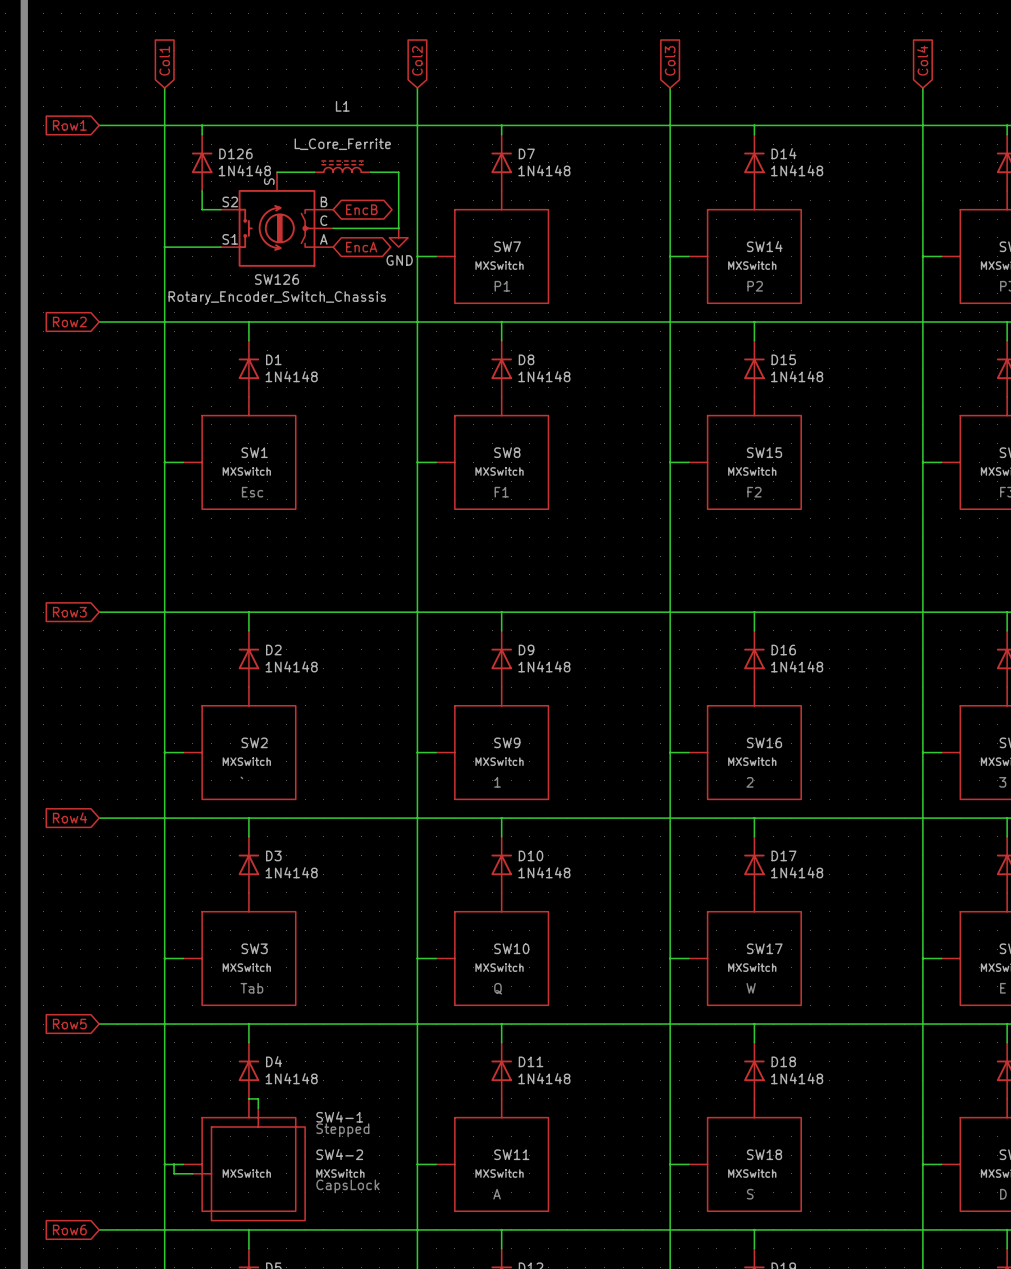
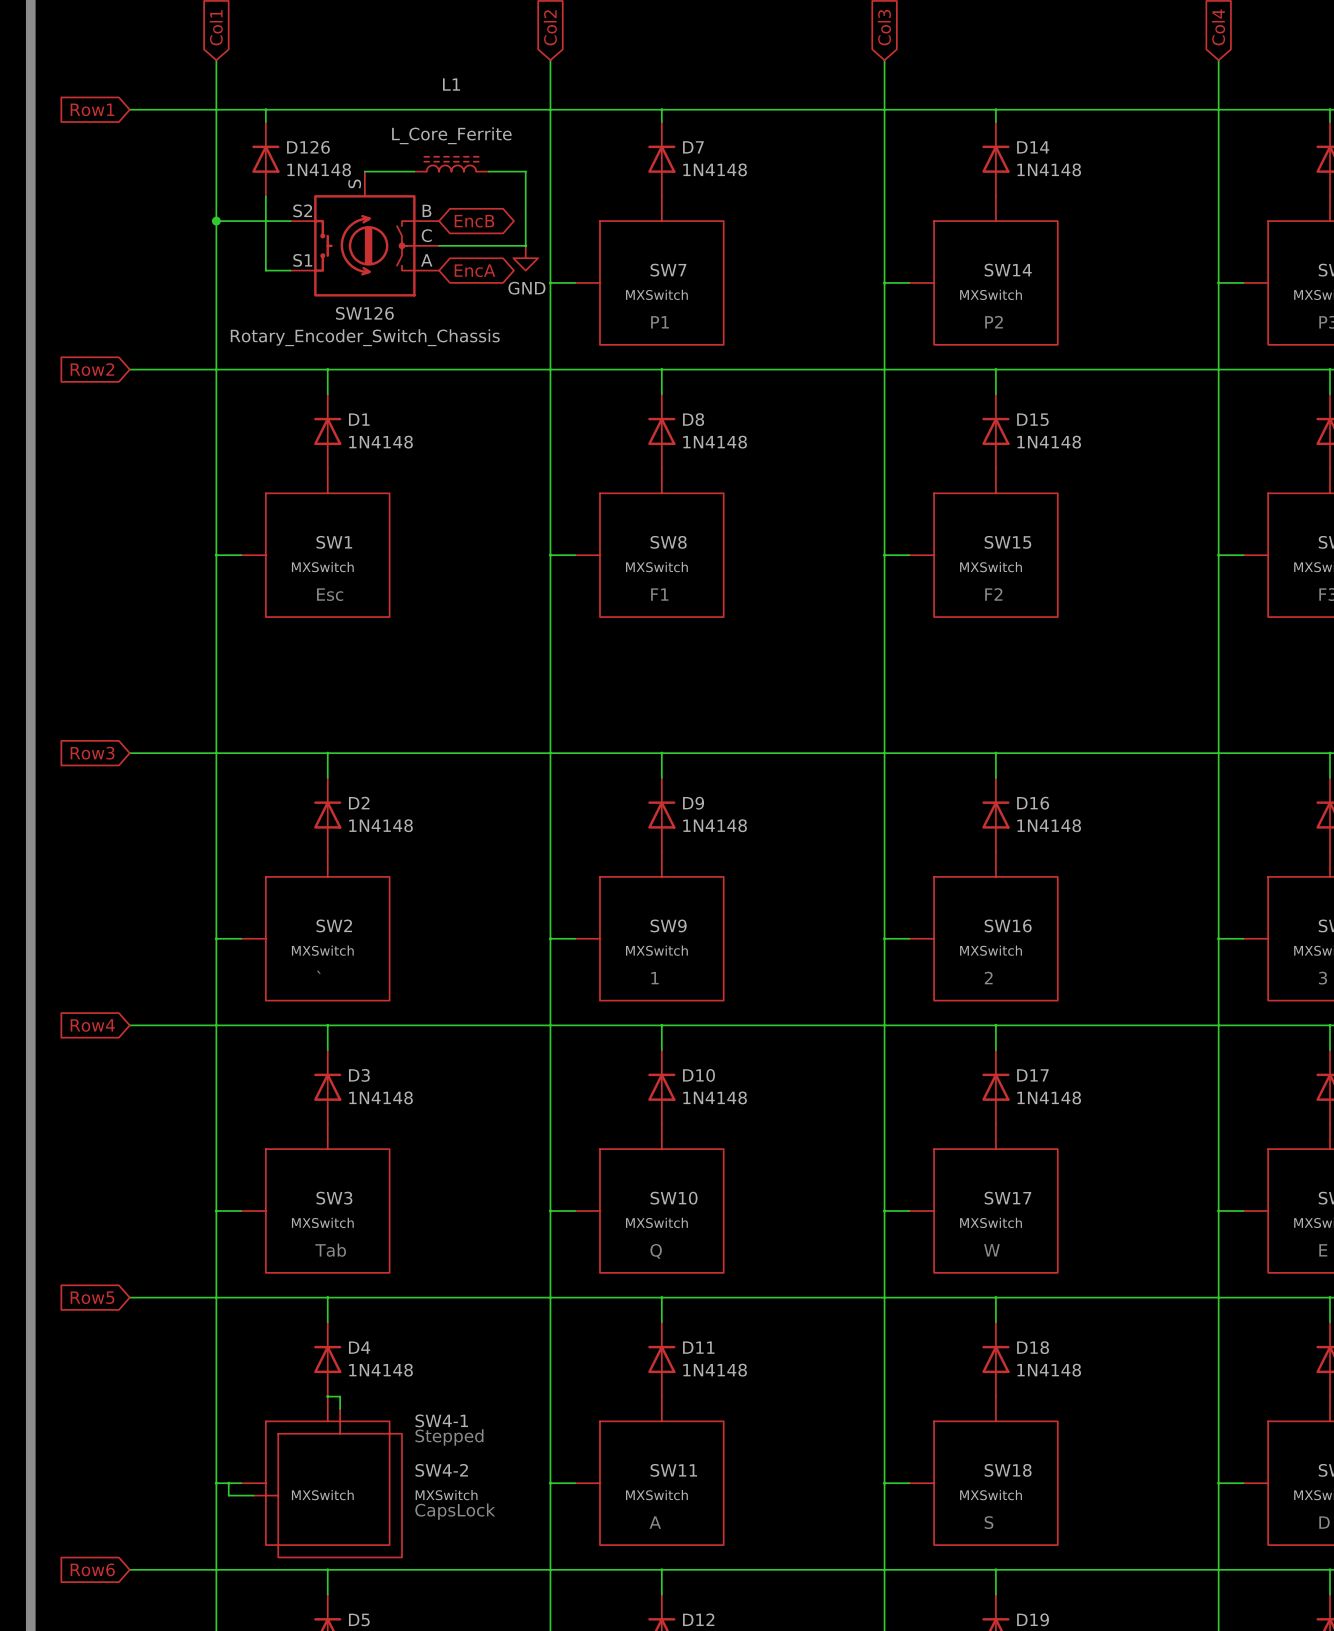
junction: none -> (216, 221)
wire: (164, 247) (202, 247) -> (216, 221) (265, 221) (265, 270)

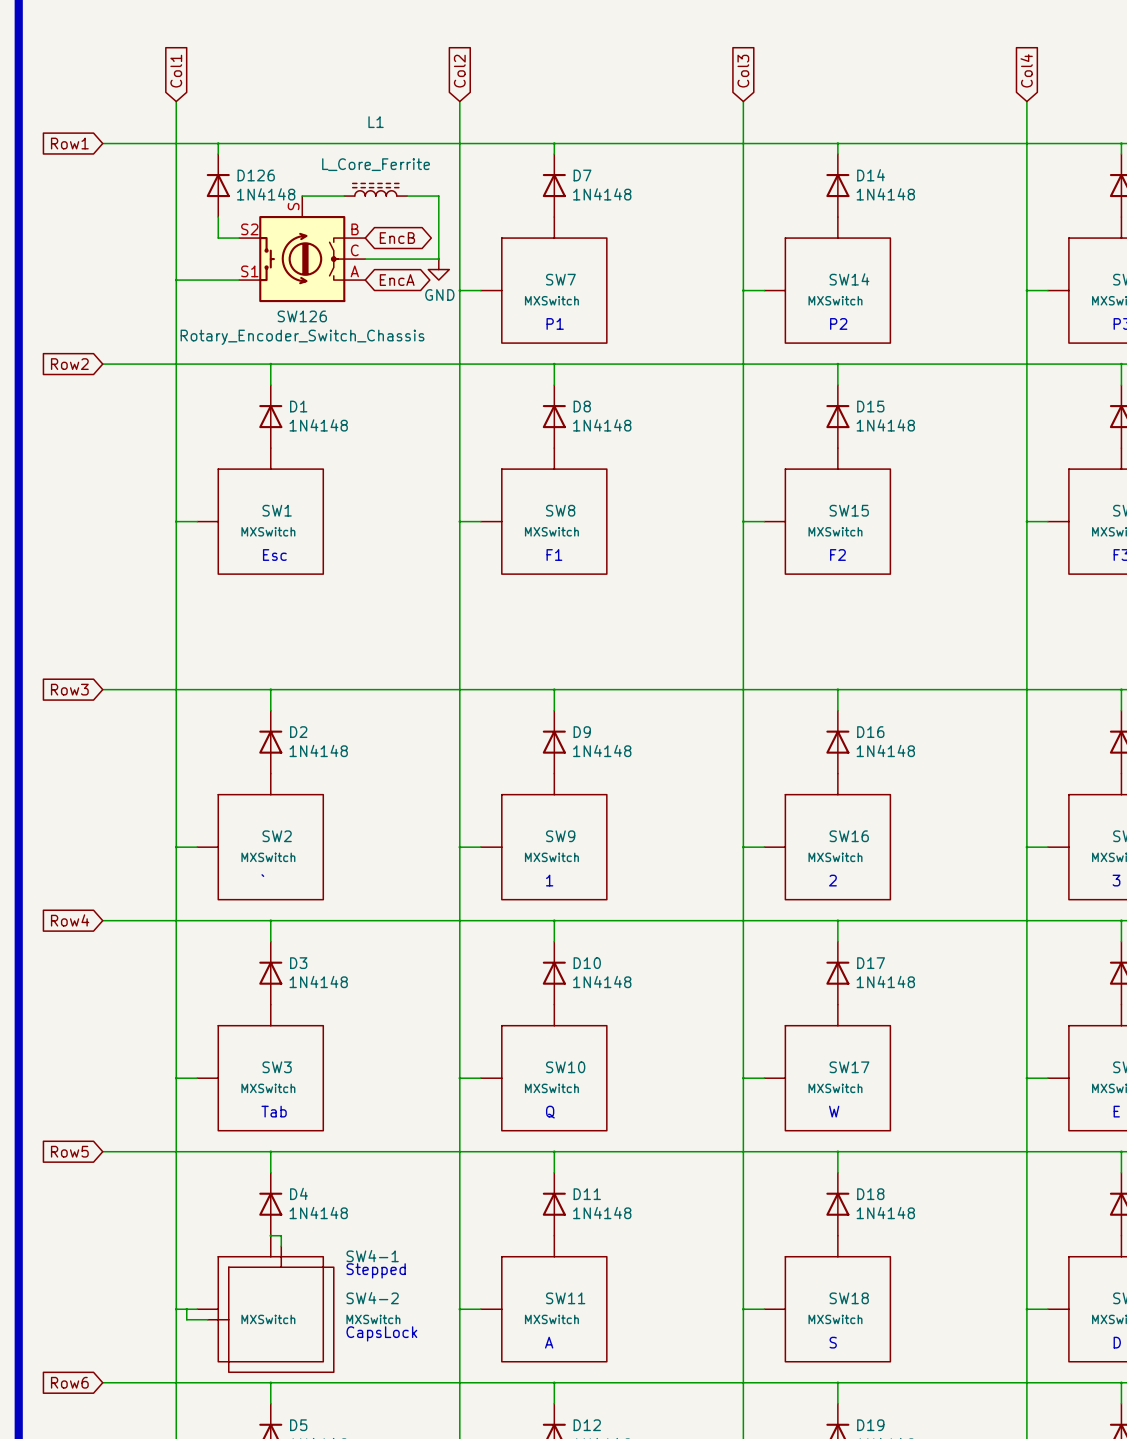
wire: (216, 221) (265, 221) (265, 270) -> (176, 280) (218, 280)
junction: (216, 221) -> none

